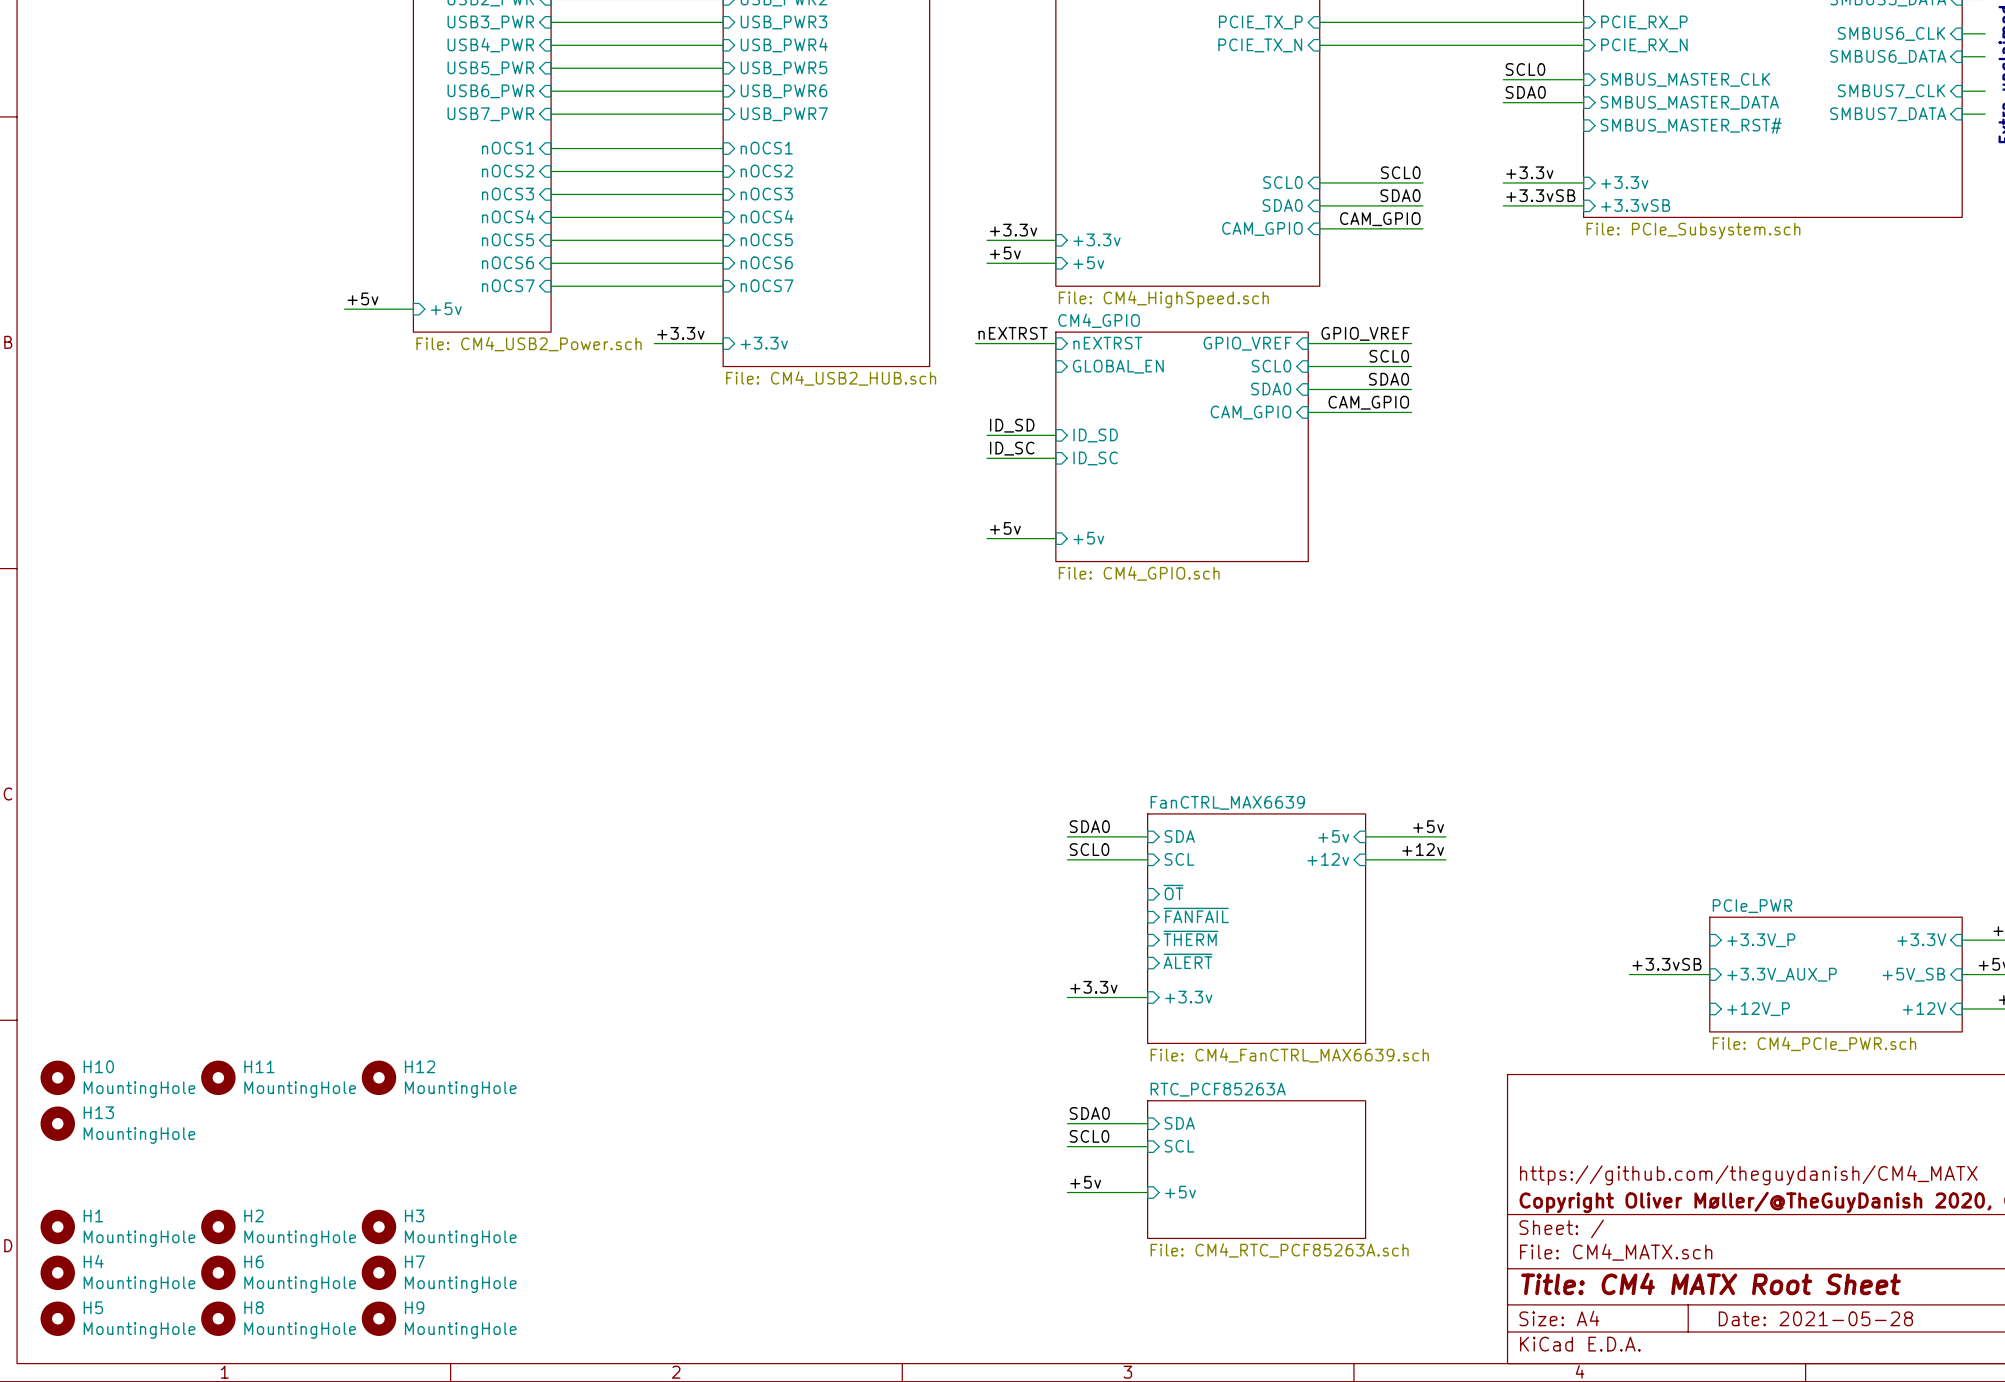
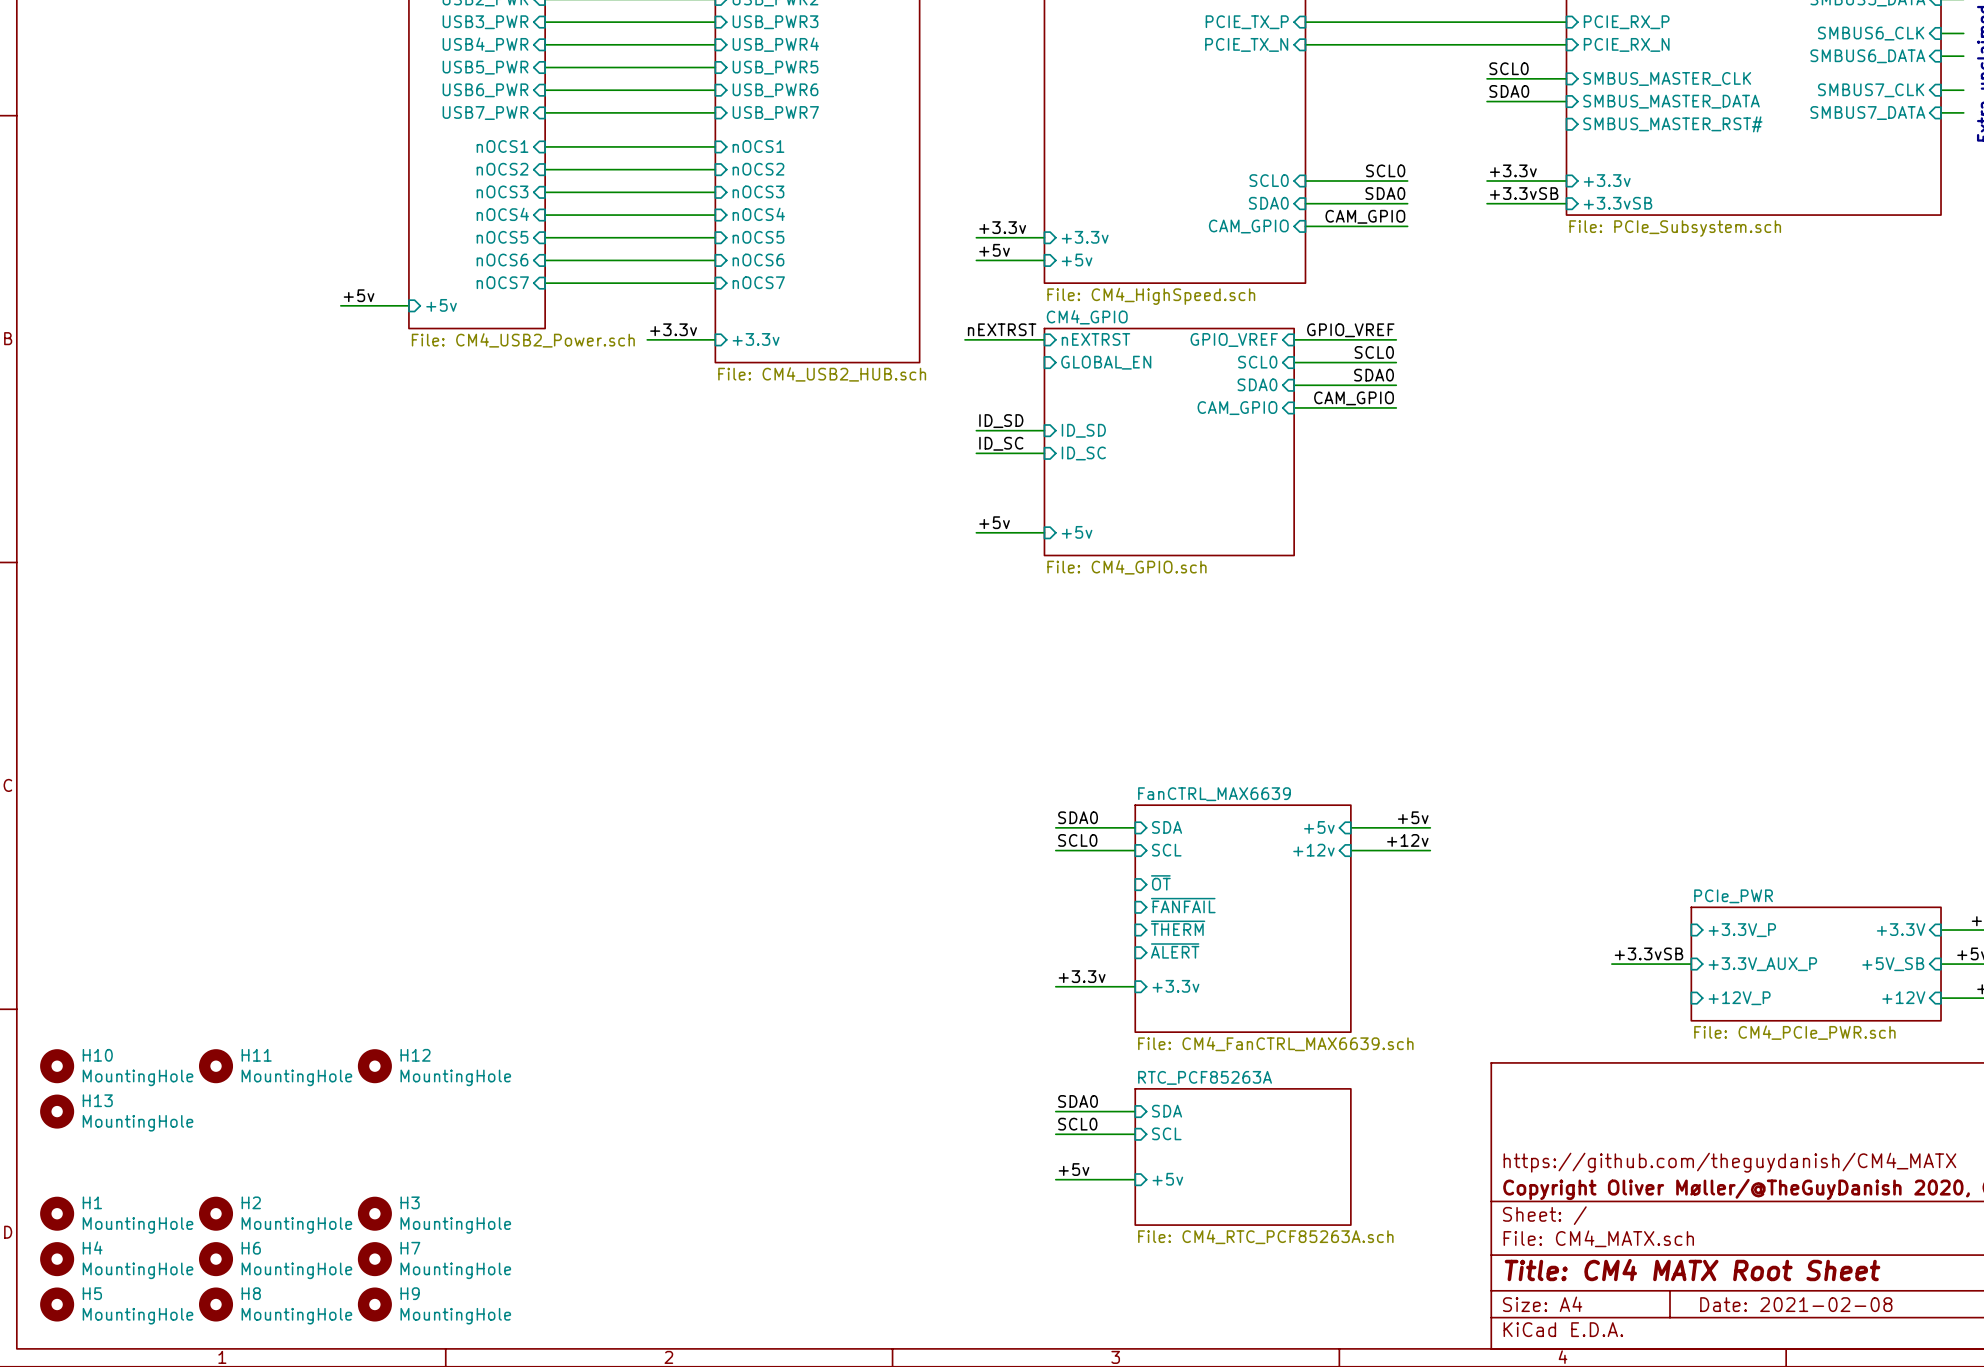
title block: Date: 2021-05-28 (1815, 1318) -> Date: 2021-02-08 (1796, 1304)

